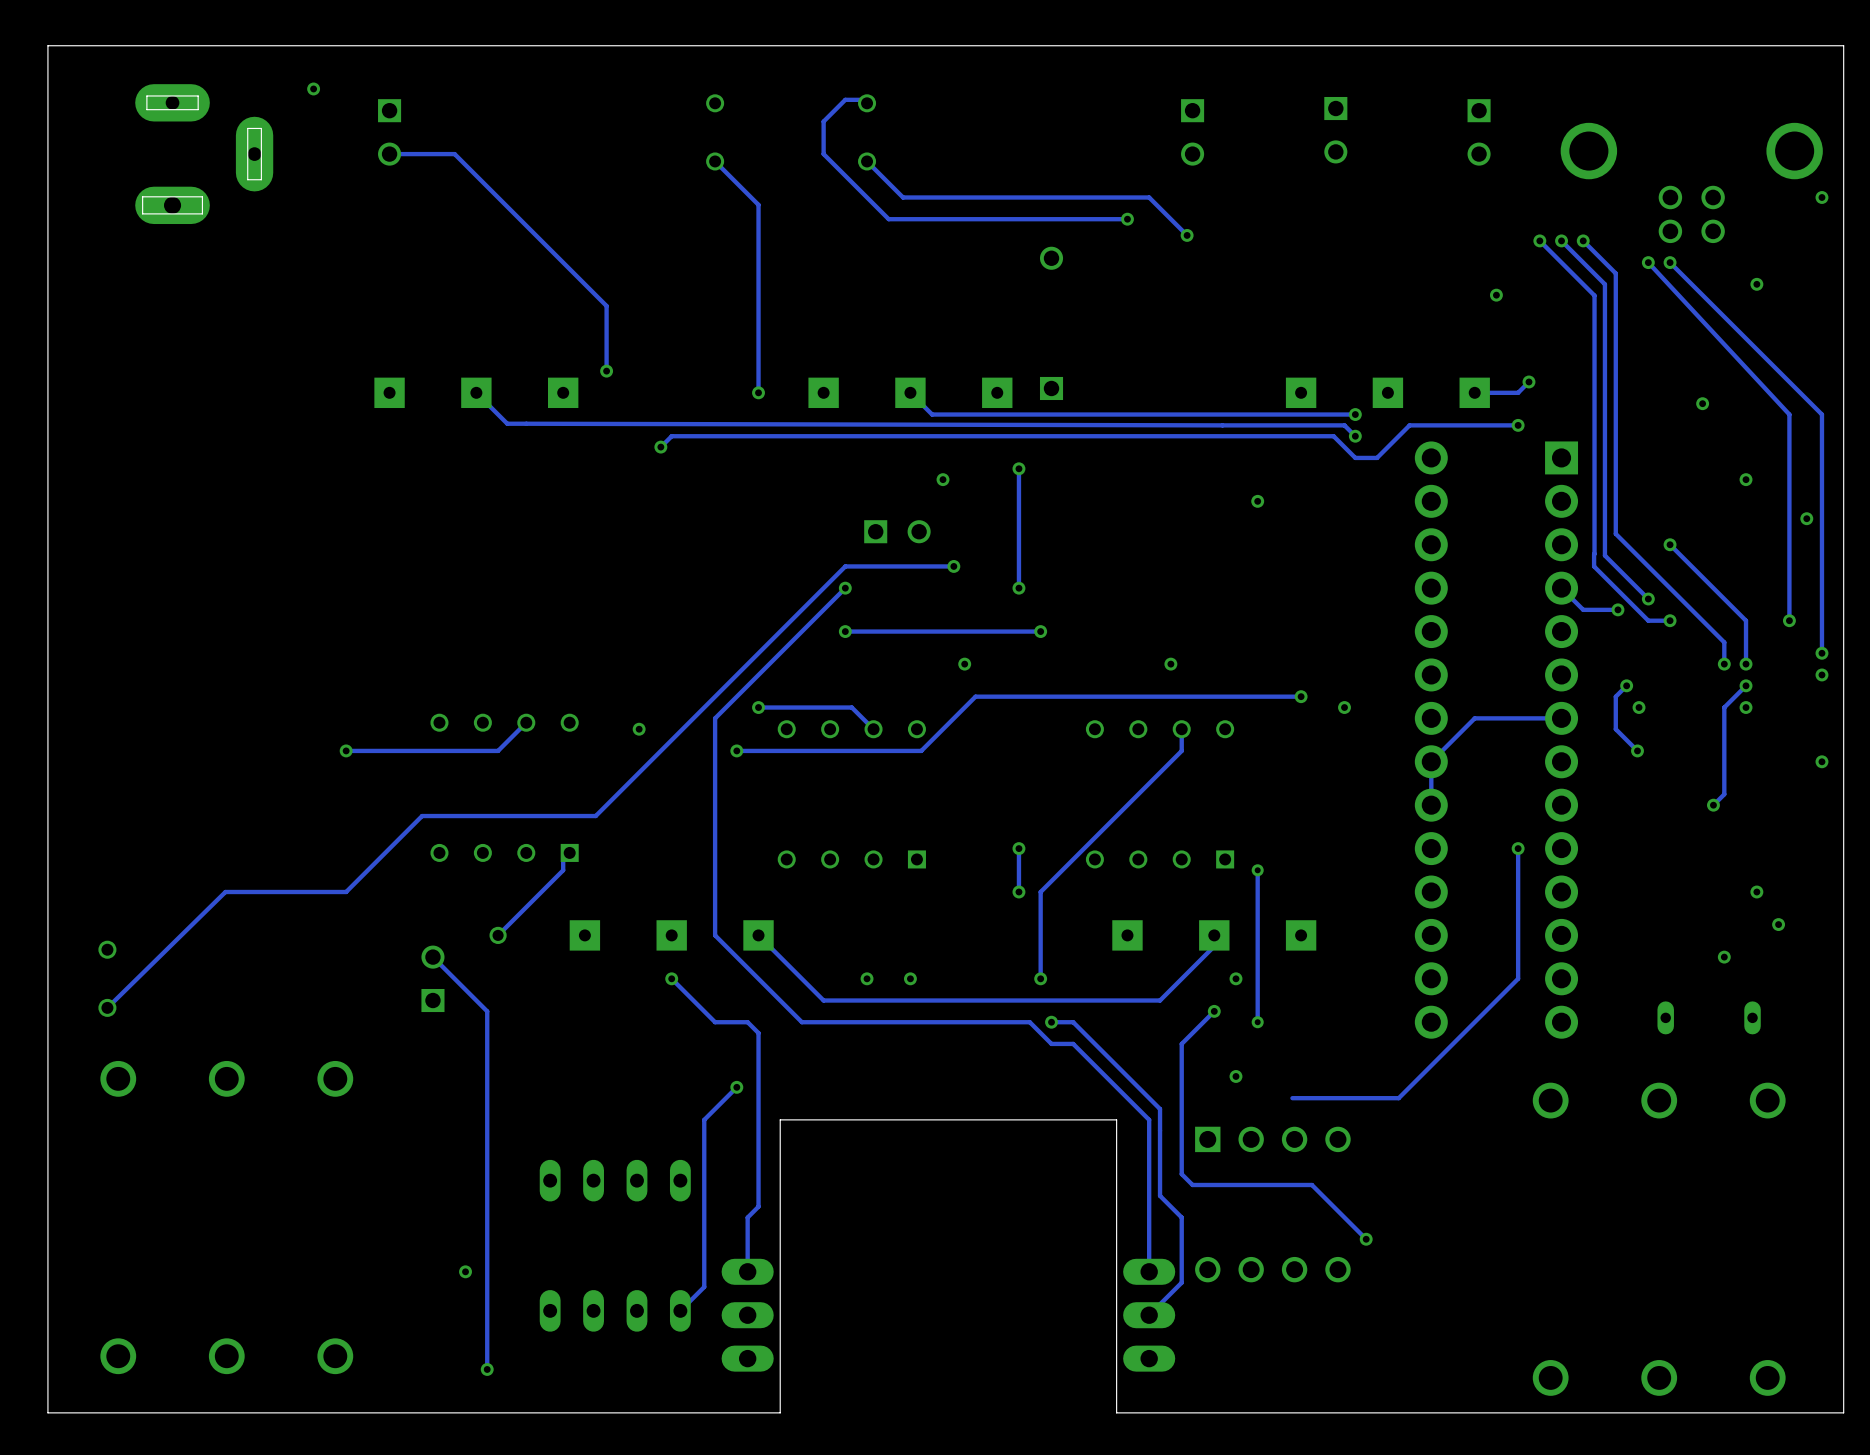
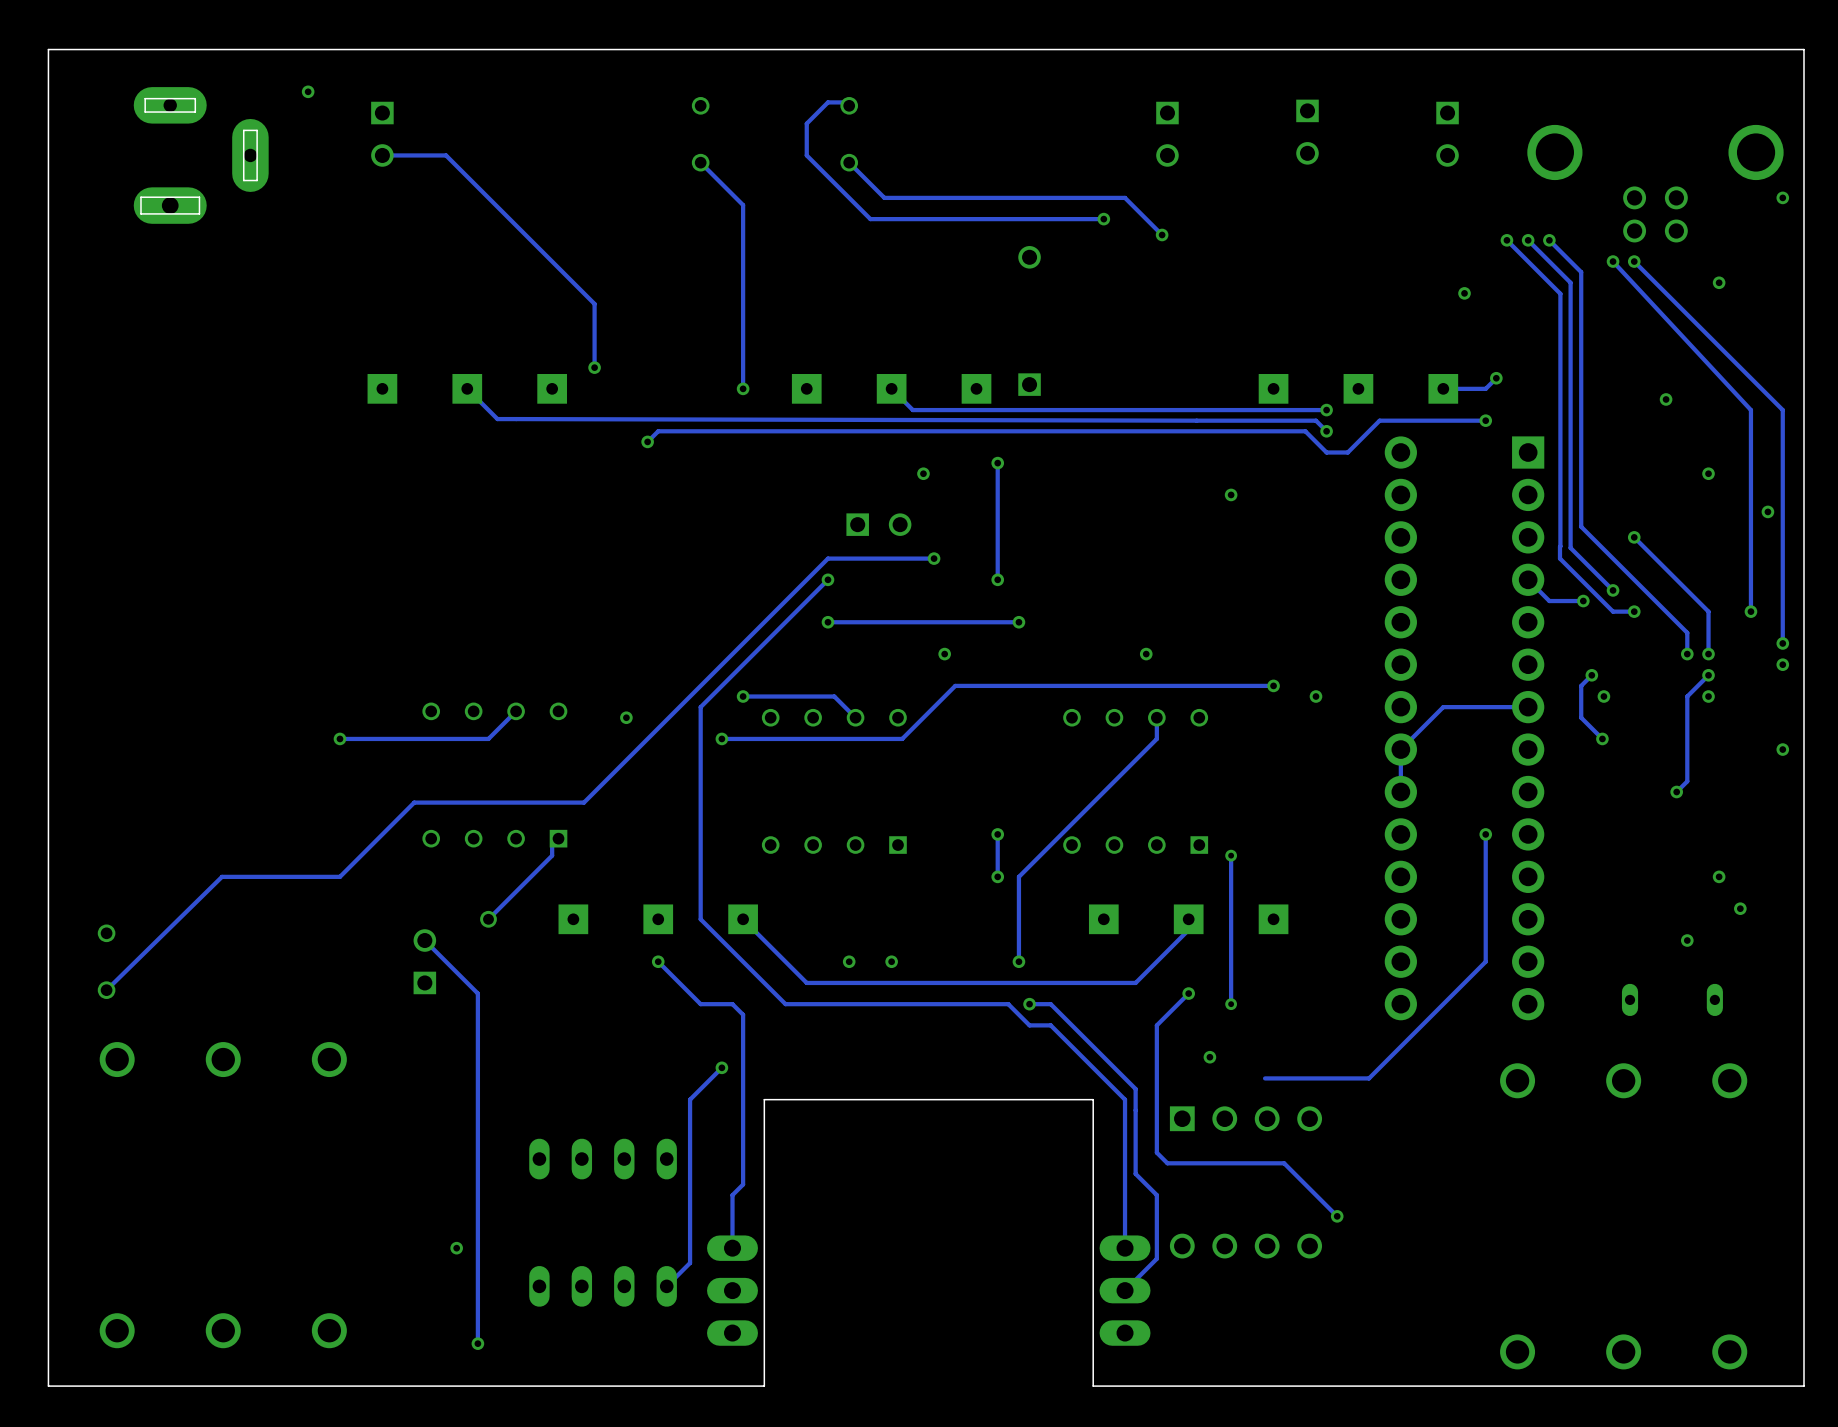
via: (1235, 978) -> none

